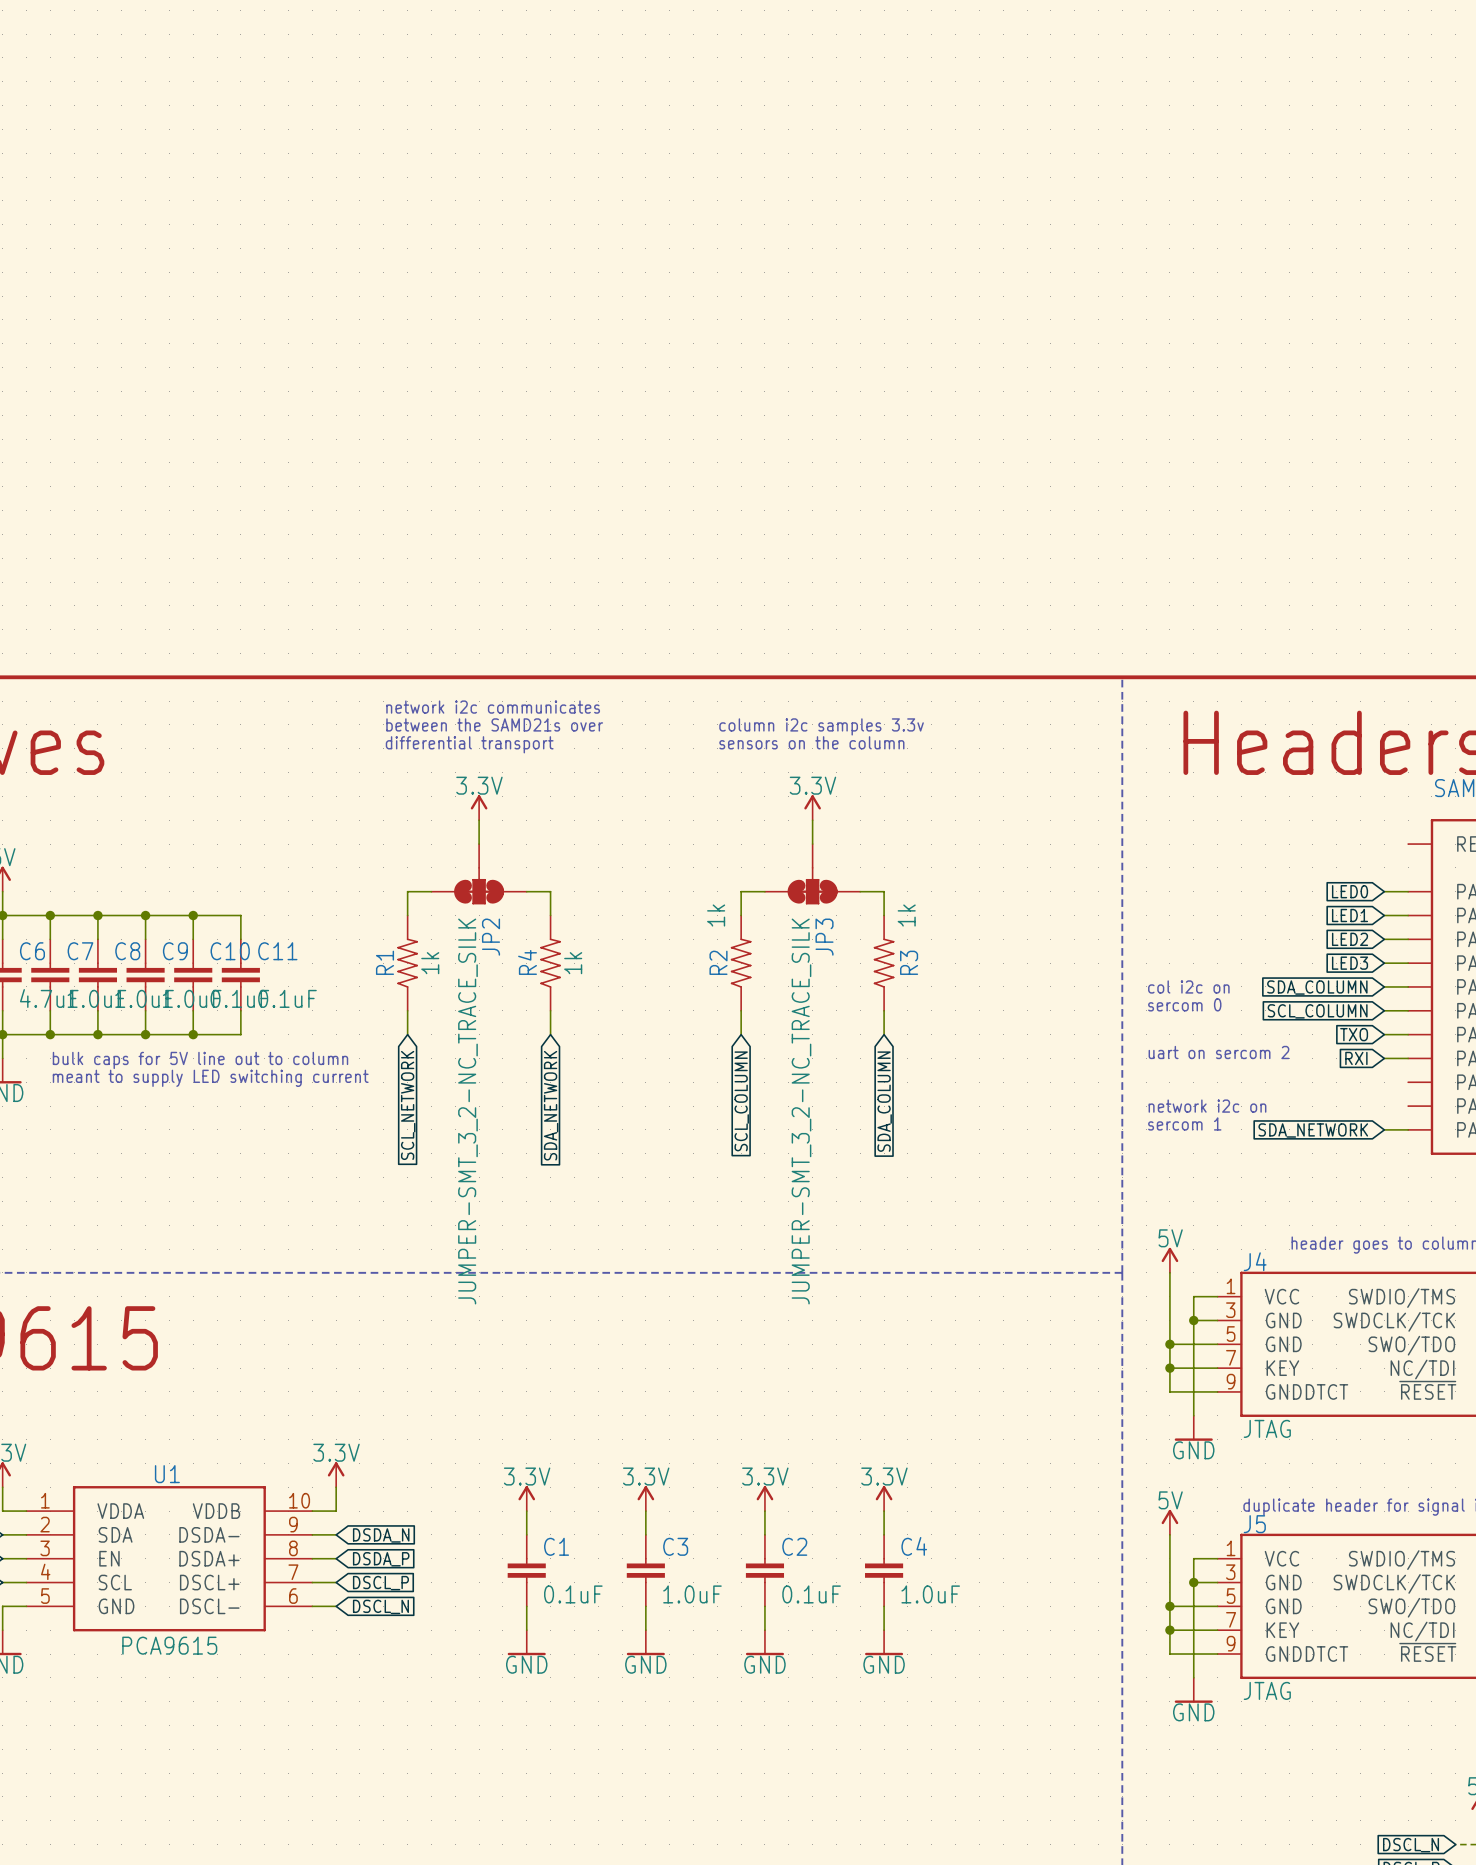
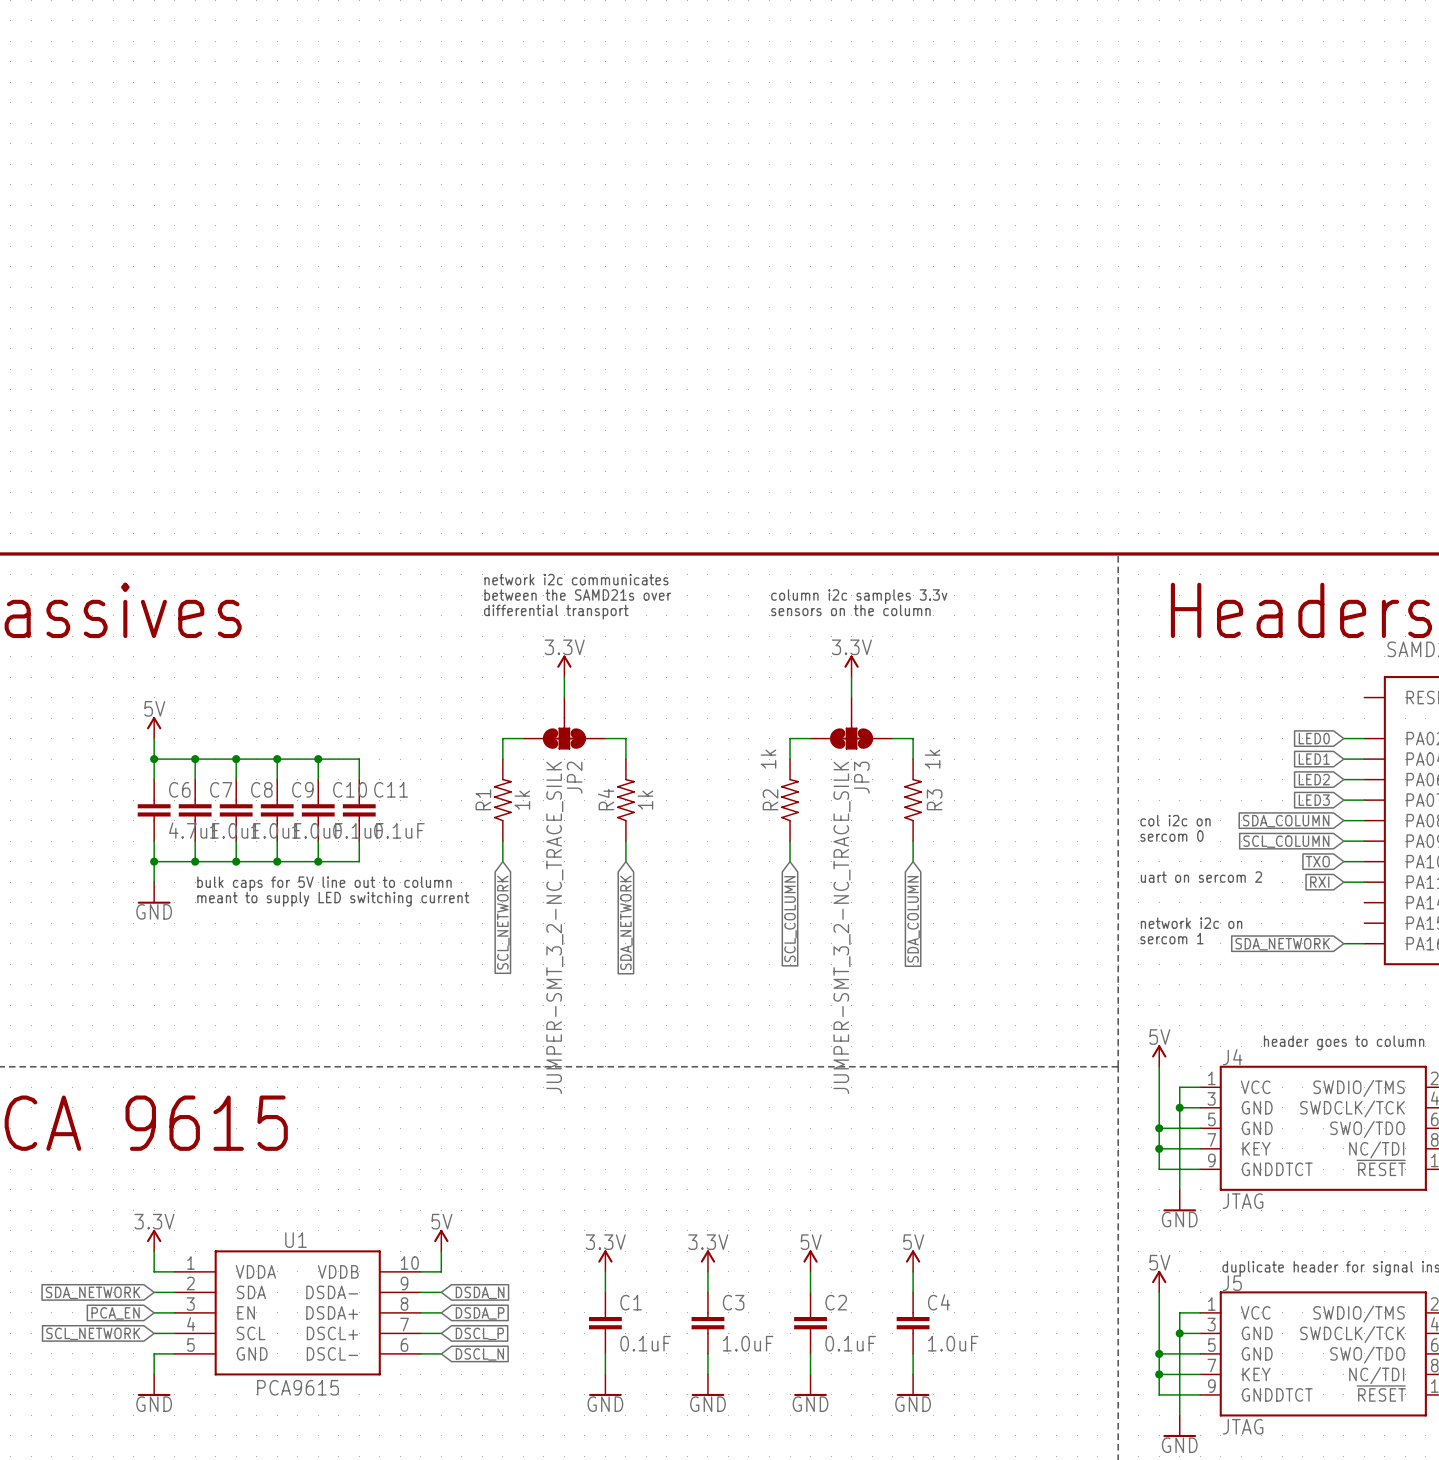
power symbol: 3.3V (336, 1474) -> 5V (441, 1240)
power symbol: 3.3V (764, 1498) -> 5V (810, 1261)
power symbol: 3.3V (884, 1498) -> 5V (913, 1261)

